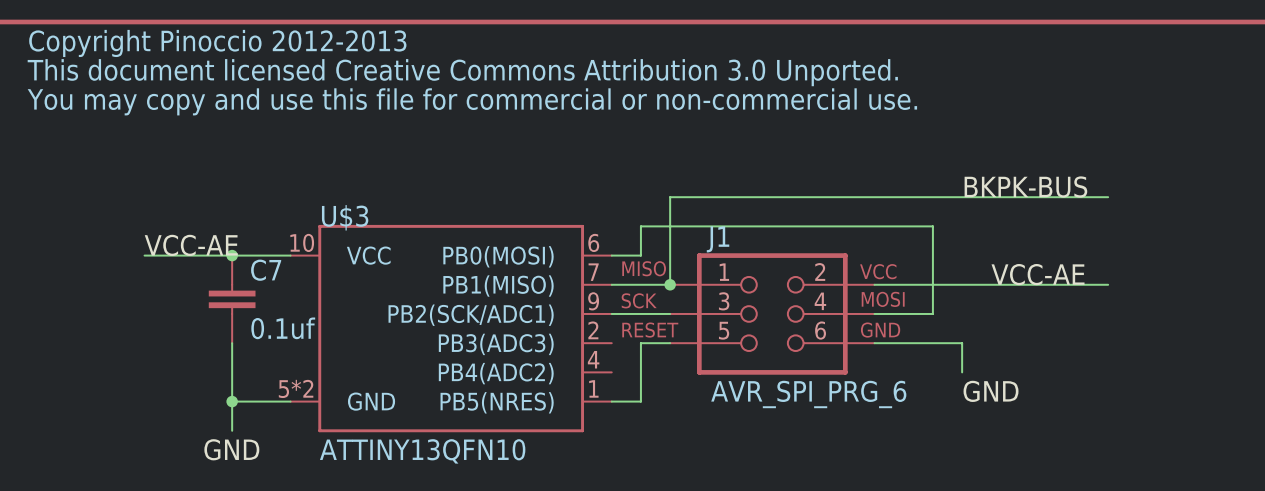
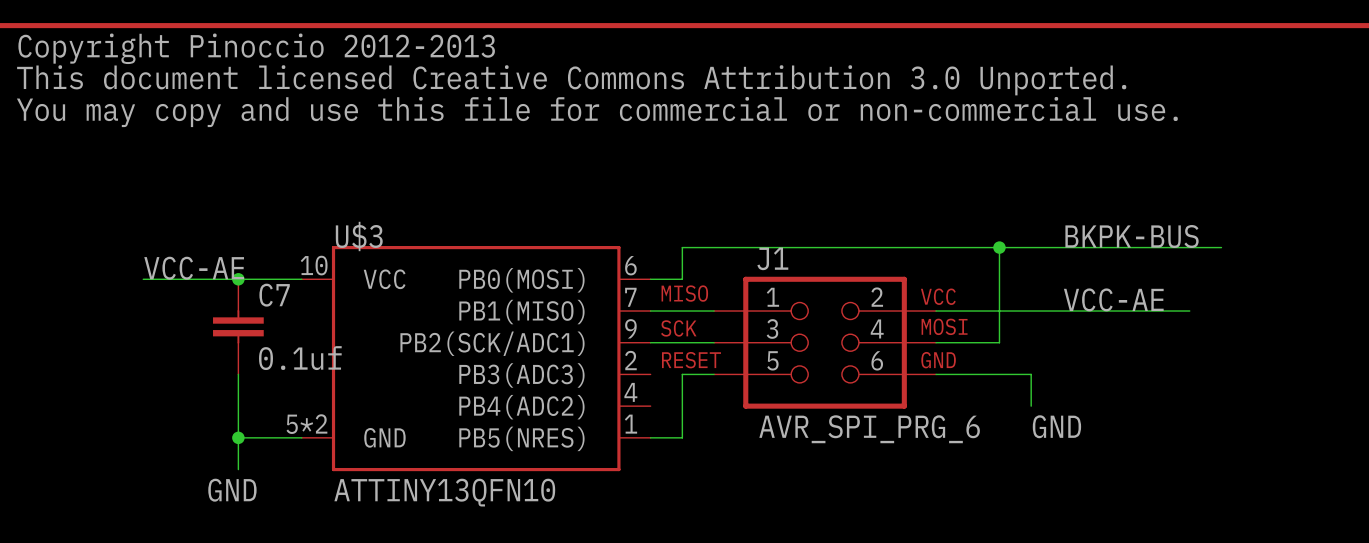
label position: BKPK-BUS (1025, 186) -> BKPK-BUS (1132, 236)
wire: (1108, 197) (670, 197) (670, 284) -> none
wire: none -> (999, 247) (1221, 247)
junction: none -> (999, 247)
junction: (670, 284) -> none

